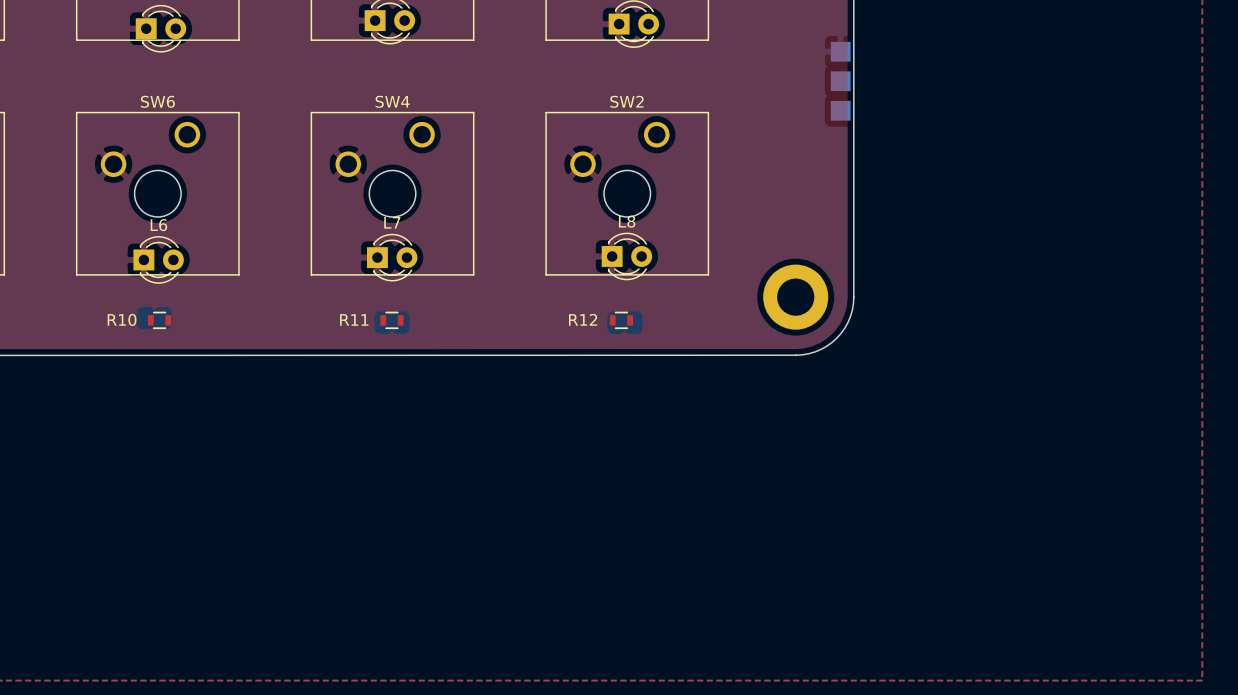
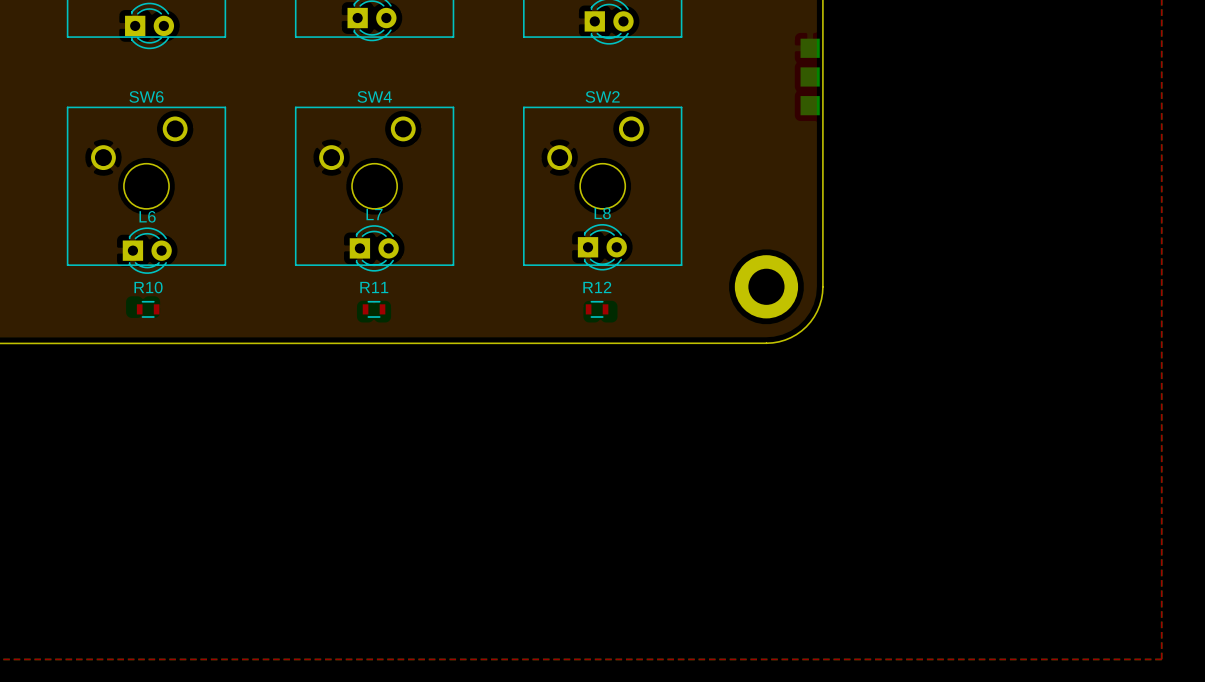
R10 name position: R10 (122, 319) -> R10 (148, 287)
R11 name position: R11 (354, 319) -> R11 (374, 287)
R12 name position: R12 (583, 319) -> R12 (597, 287)

